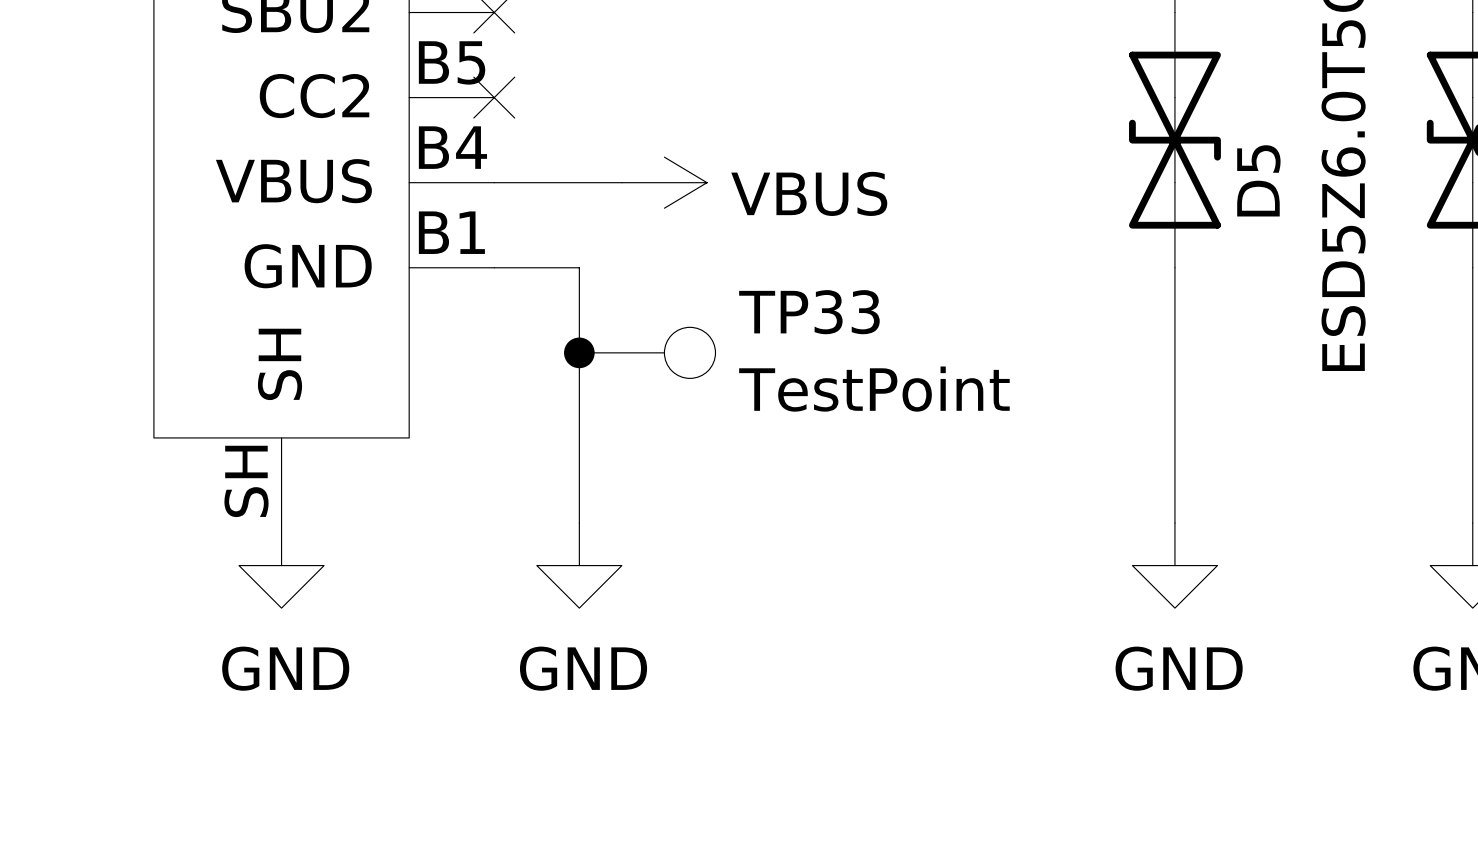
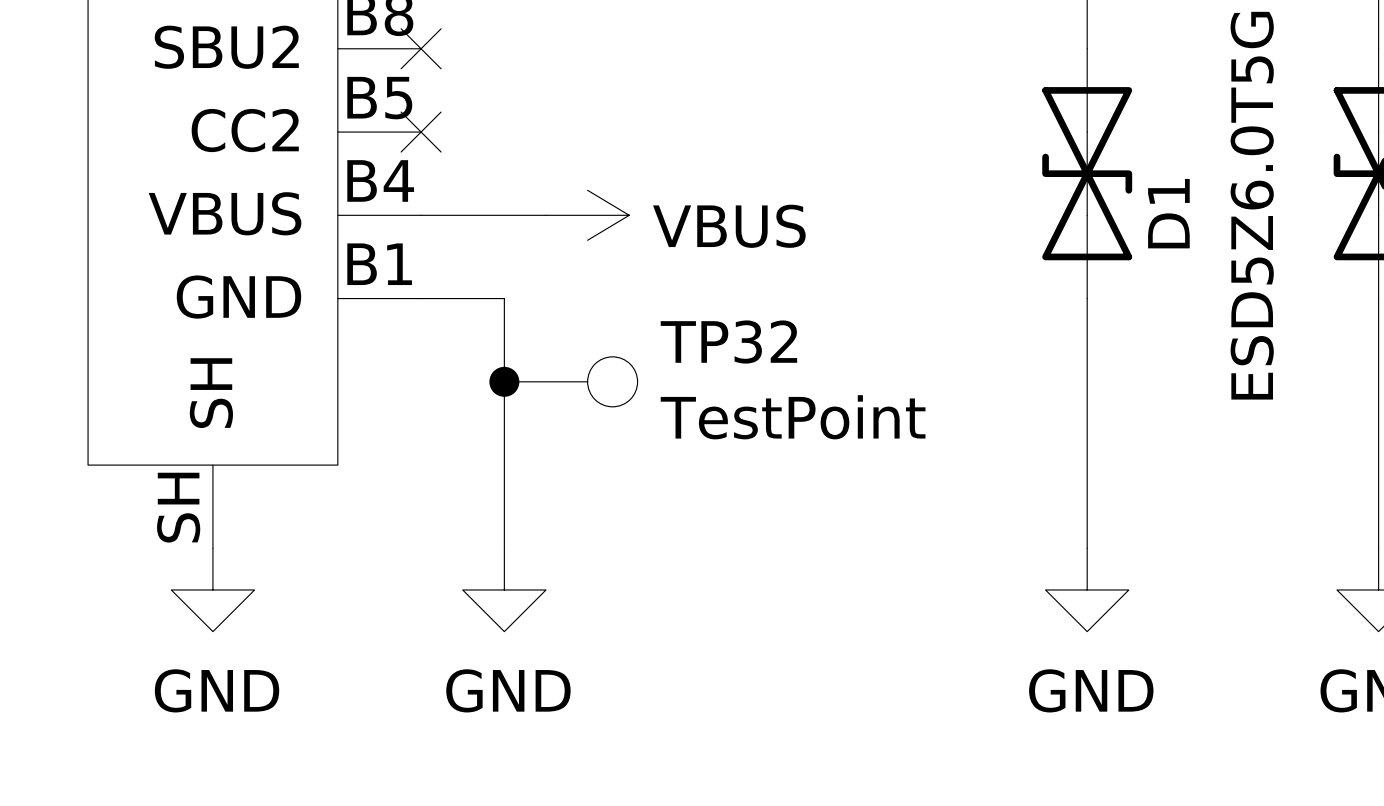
D5 name: D5 (1258, 180) -> D1 (1168, 213)
TP33 name: TP33 (809, 312) -> TP32 (728, 342)

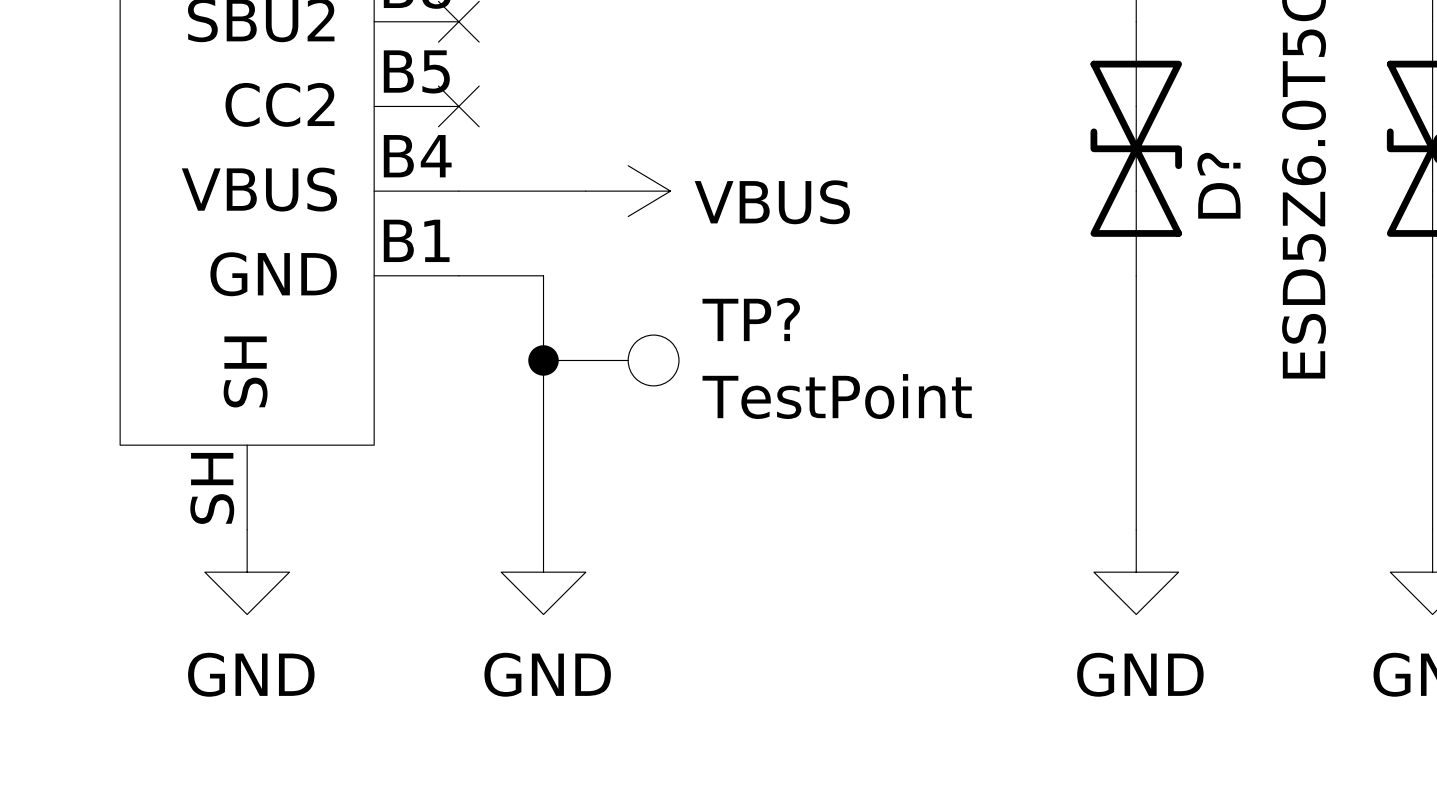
D1 name: D1 (1168, 213) -> D? (1218, 185)
TP32 name: TP32 (728, 342) -> TP? (751, 319)

